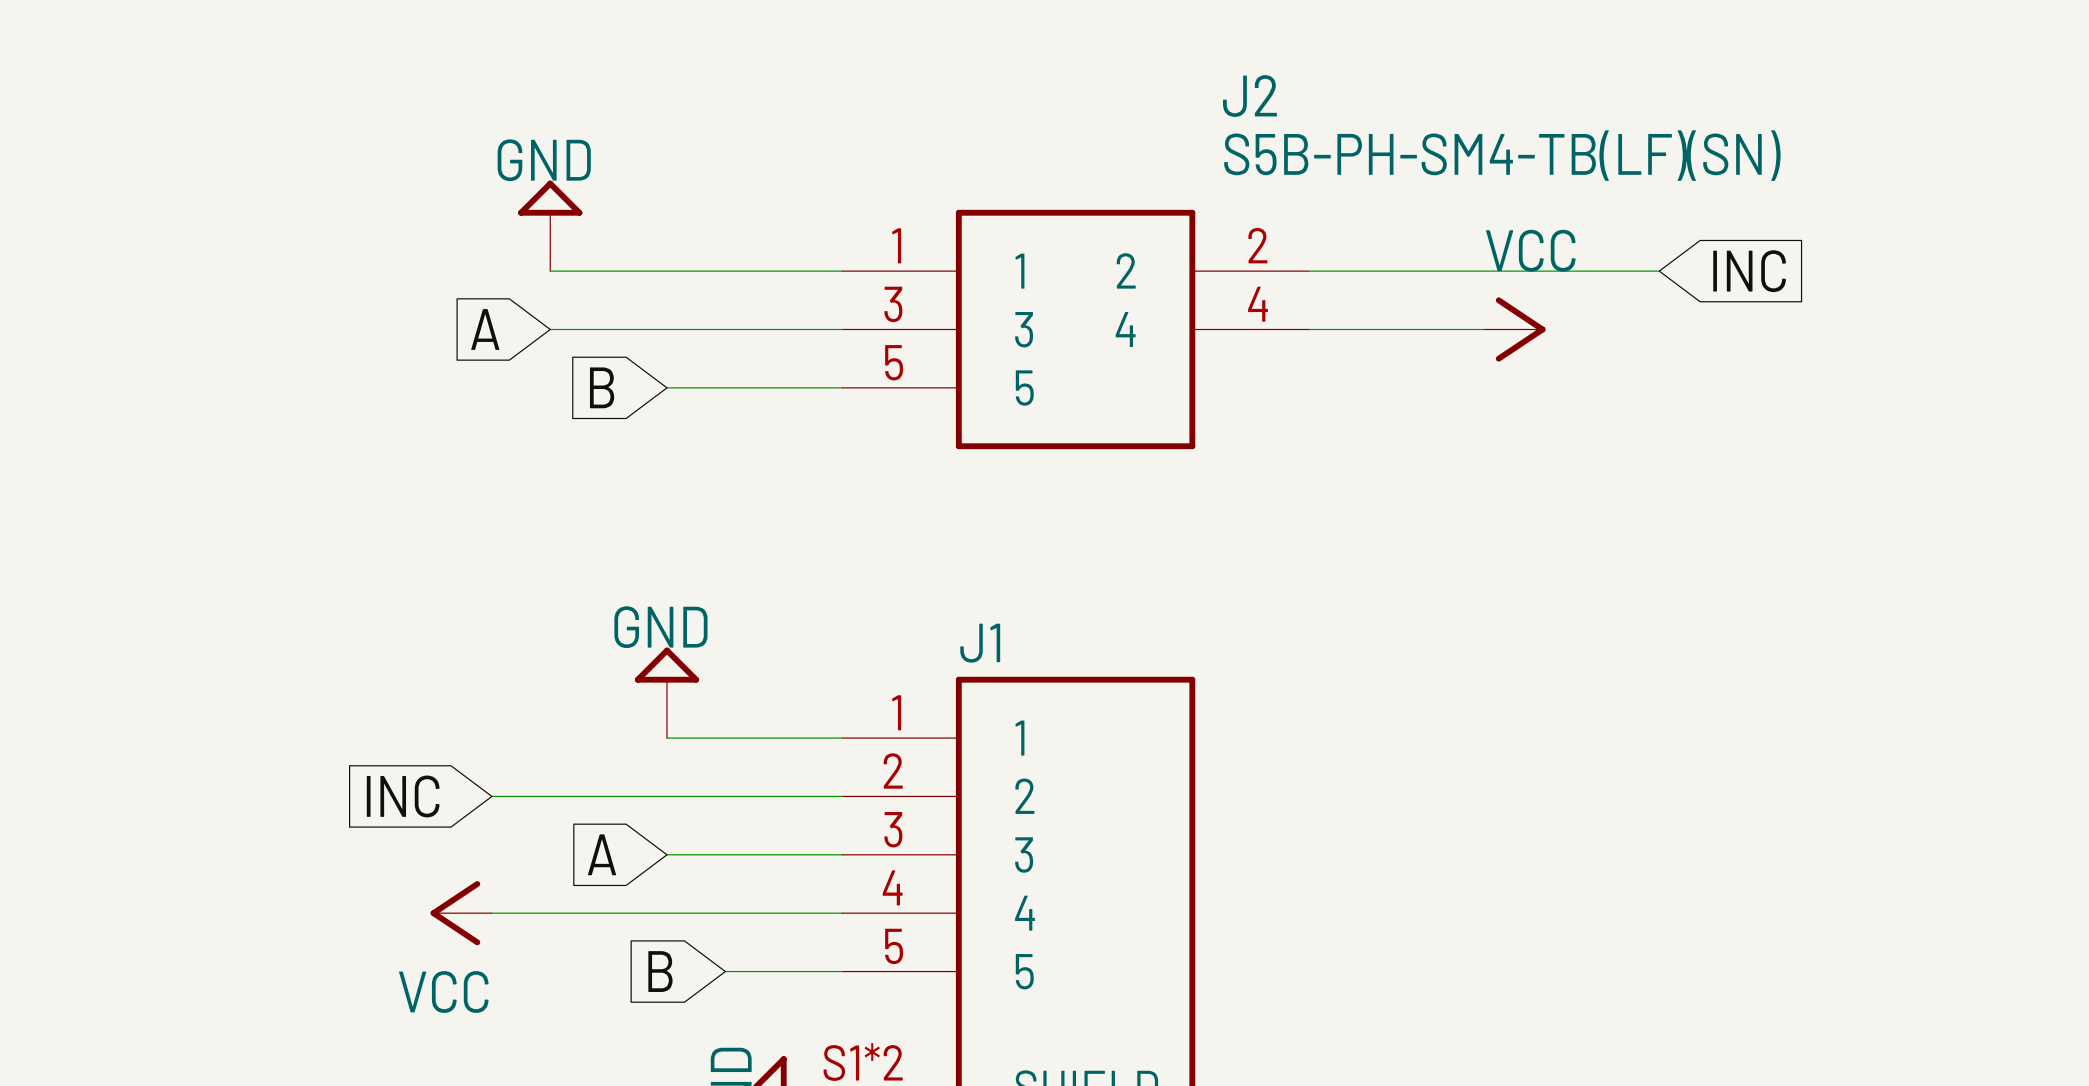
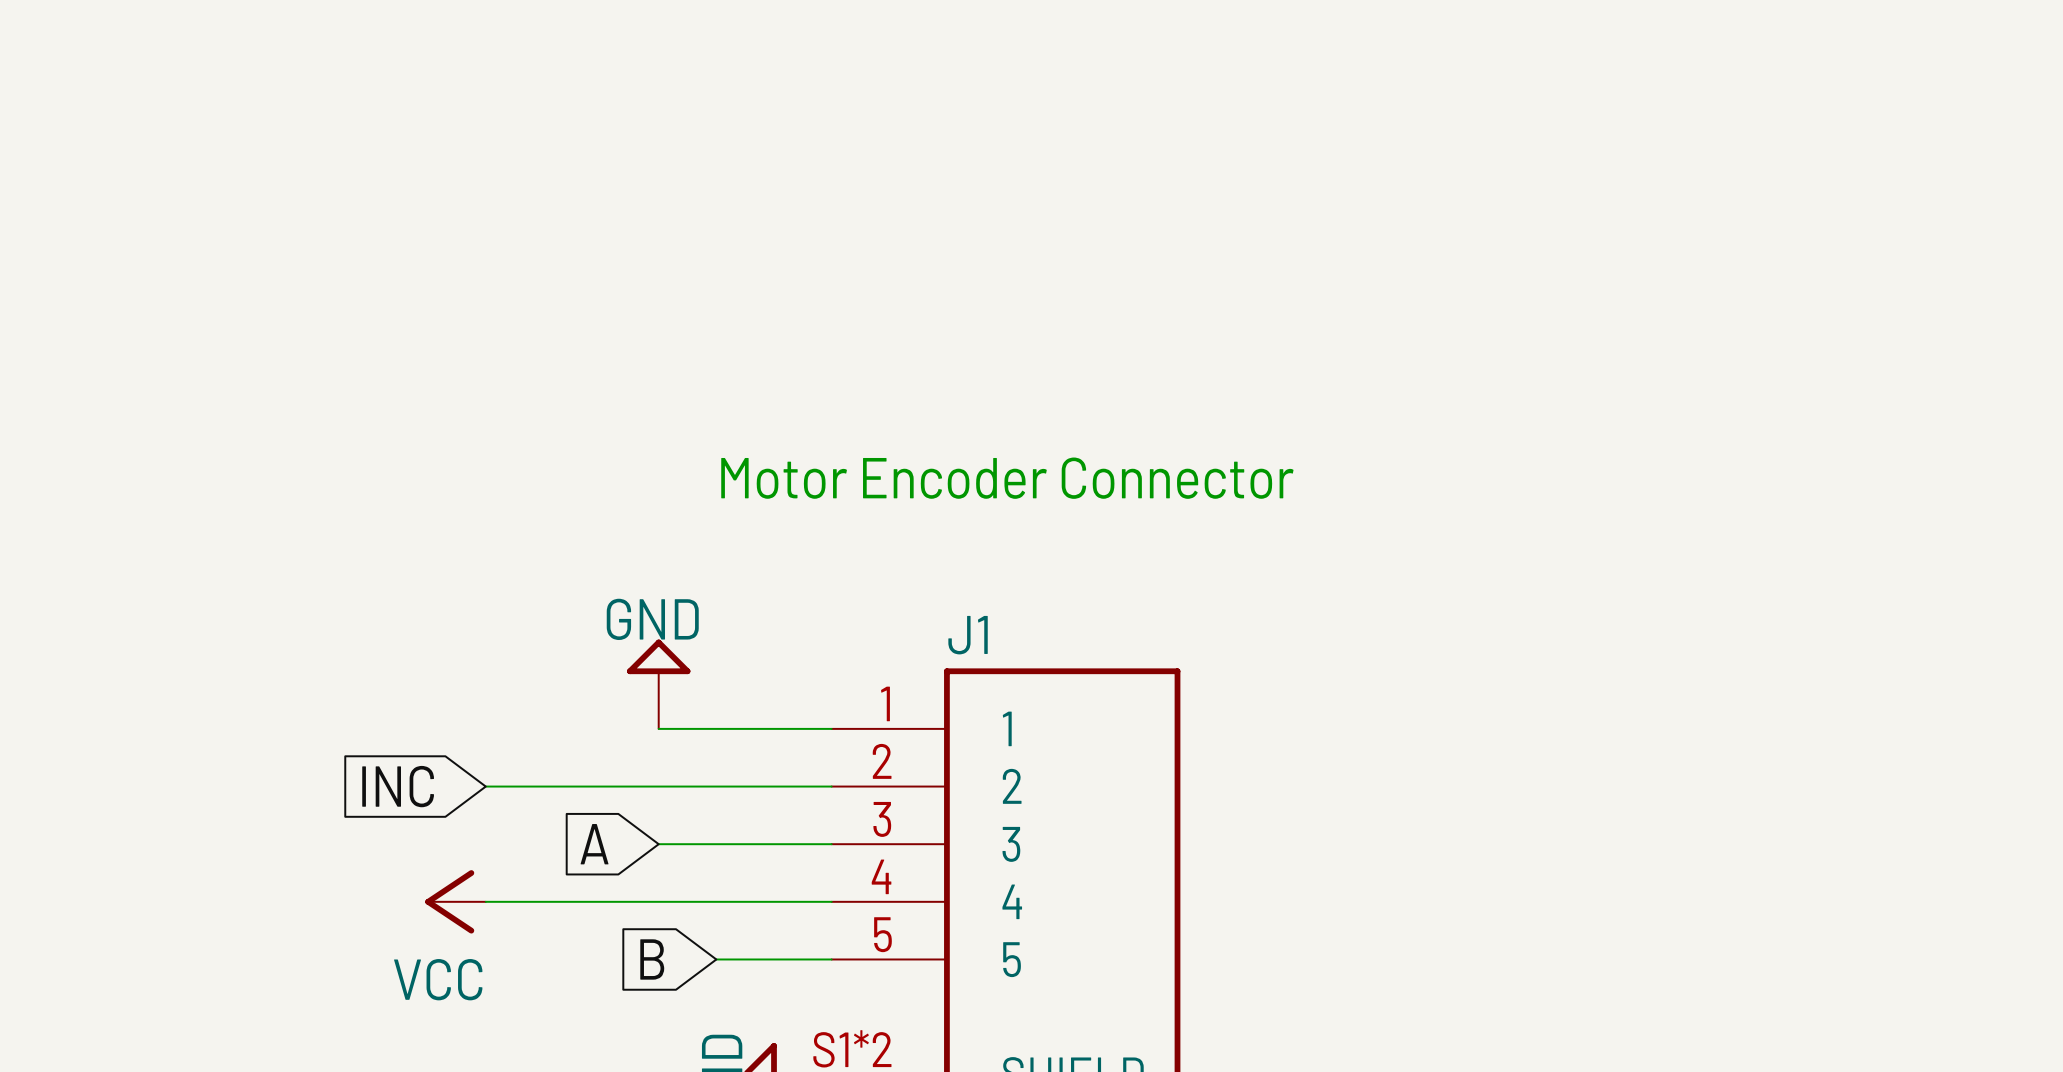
power symbol: GND (550, 225) -> none
wire: (550, 271) (842, 271) -> none
wire: (1309, 271) (1659, 271) -> none
global label: INC (1749, 271) -> none
global label: A (485, 329) -> none
wire: (550, 329) (842, 329) -> none
J2: S5B-PH-SM4-TB(LF)(SN) (1075, 329) -> none
wire: (1309, 329) (1484, 329) -> none
power symbol: VCC (1514, 329) -> none
global label: B (602, 387) -> none
wire: (667, 387) (842, 387) -> none
text: none -> Motor Encoder Connector (1007, 478)

